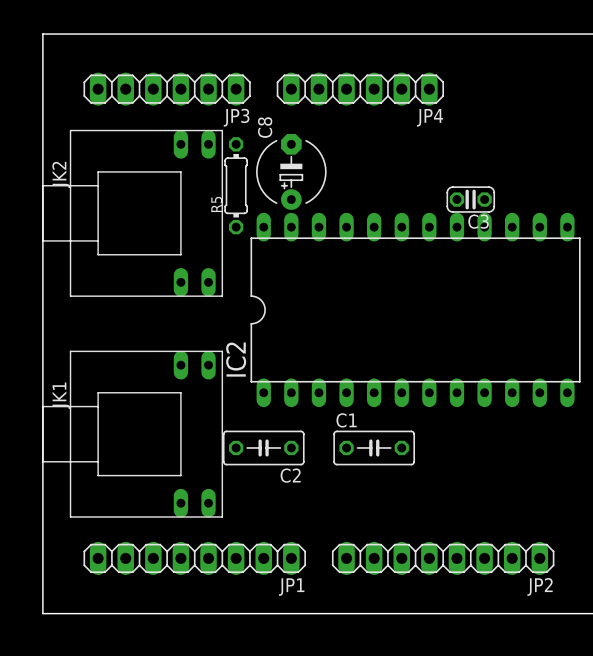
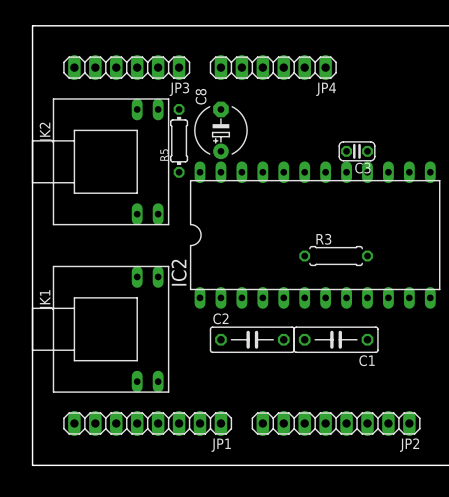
R3: none -> (336, 256)
C1 name position: C1 (346, 420) -> C1 (367, 360)
C2 footprint: [222, 430, 305, 466] -> [209, 326, 295, 353]
C1 footprint: [333, 430, 416, 466] -> [293, 326, 379, 353]
C2 name position: C2 (290, 475) -> C2 (220, 318)

